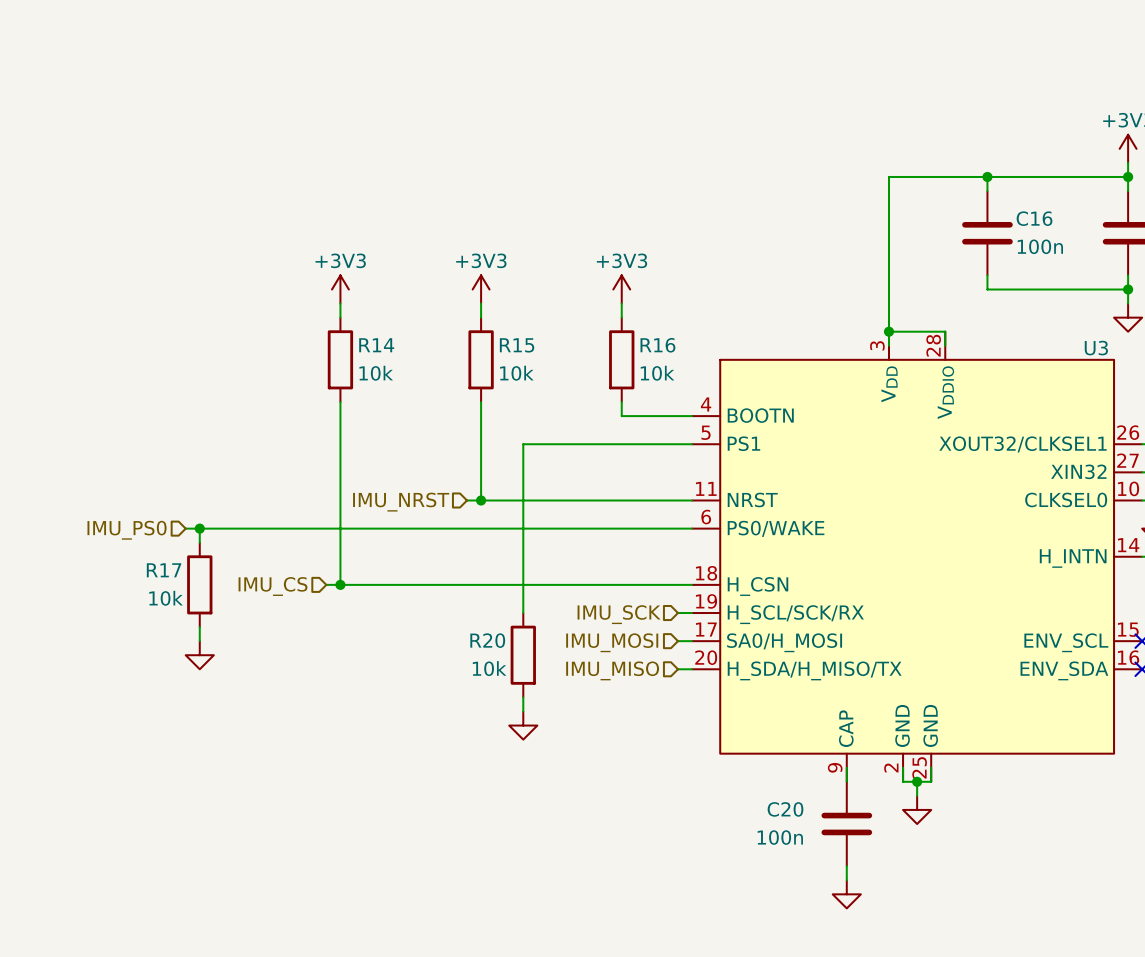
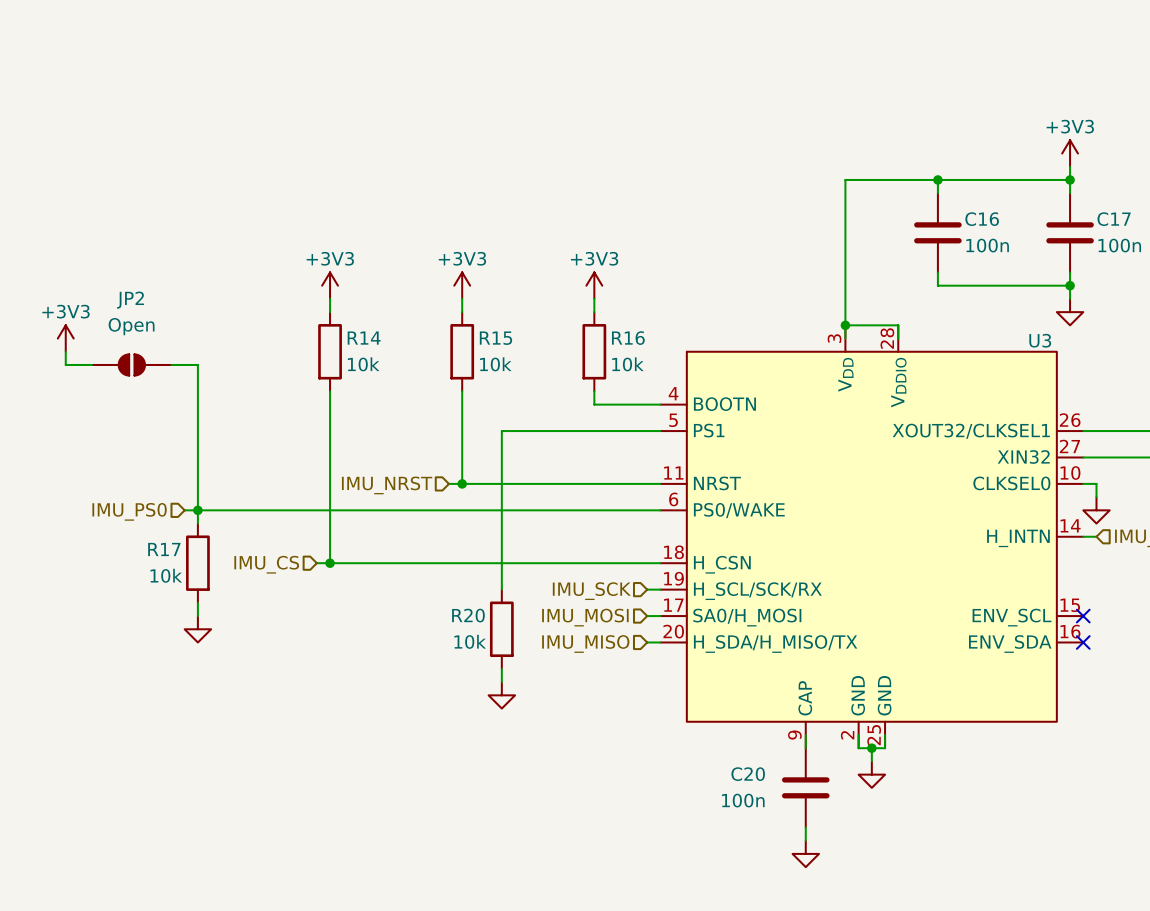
power symbol: none -> +3V3 (65, 338)
wire: none -> (65, 351) (65, 364) (92, 364)
JP2: none -> Open (131, 364)
wire: none -> (171, 364) (197, 364) (197, 510)

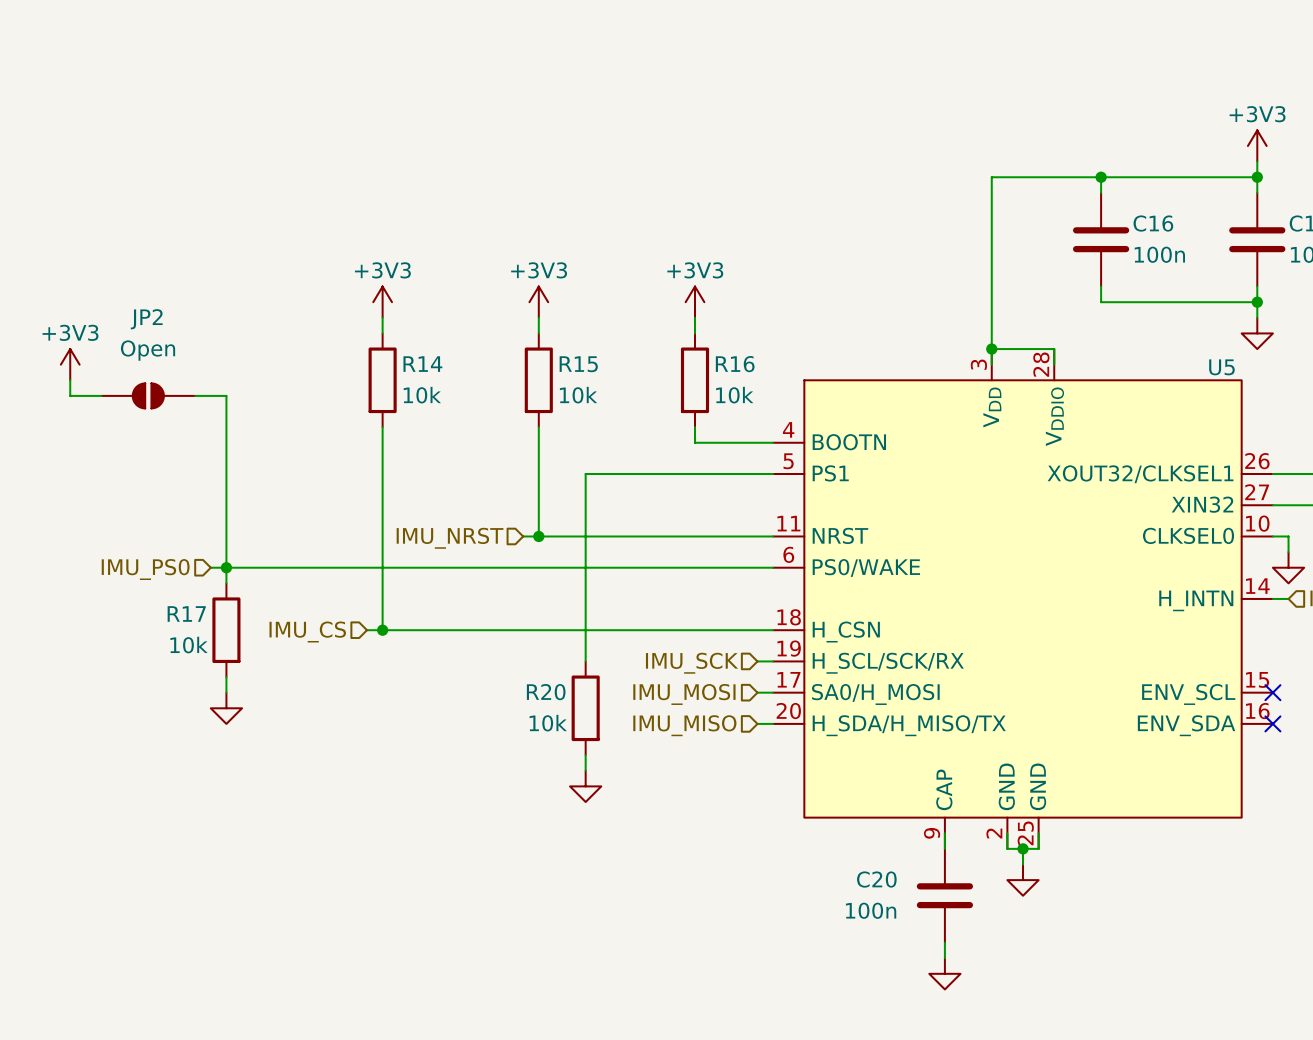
U3 name: U3 (1040, 340) -> U5 (1221, 367)

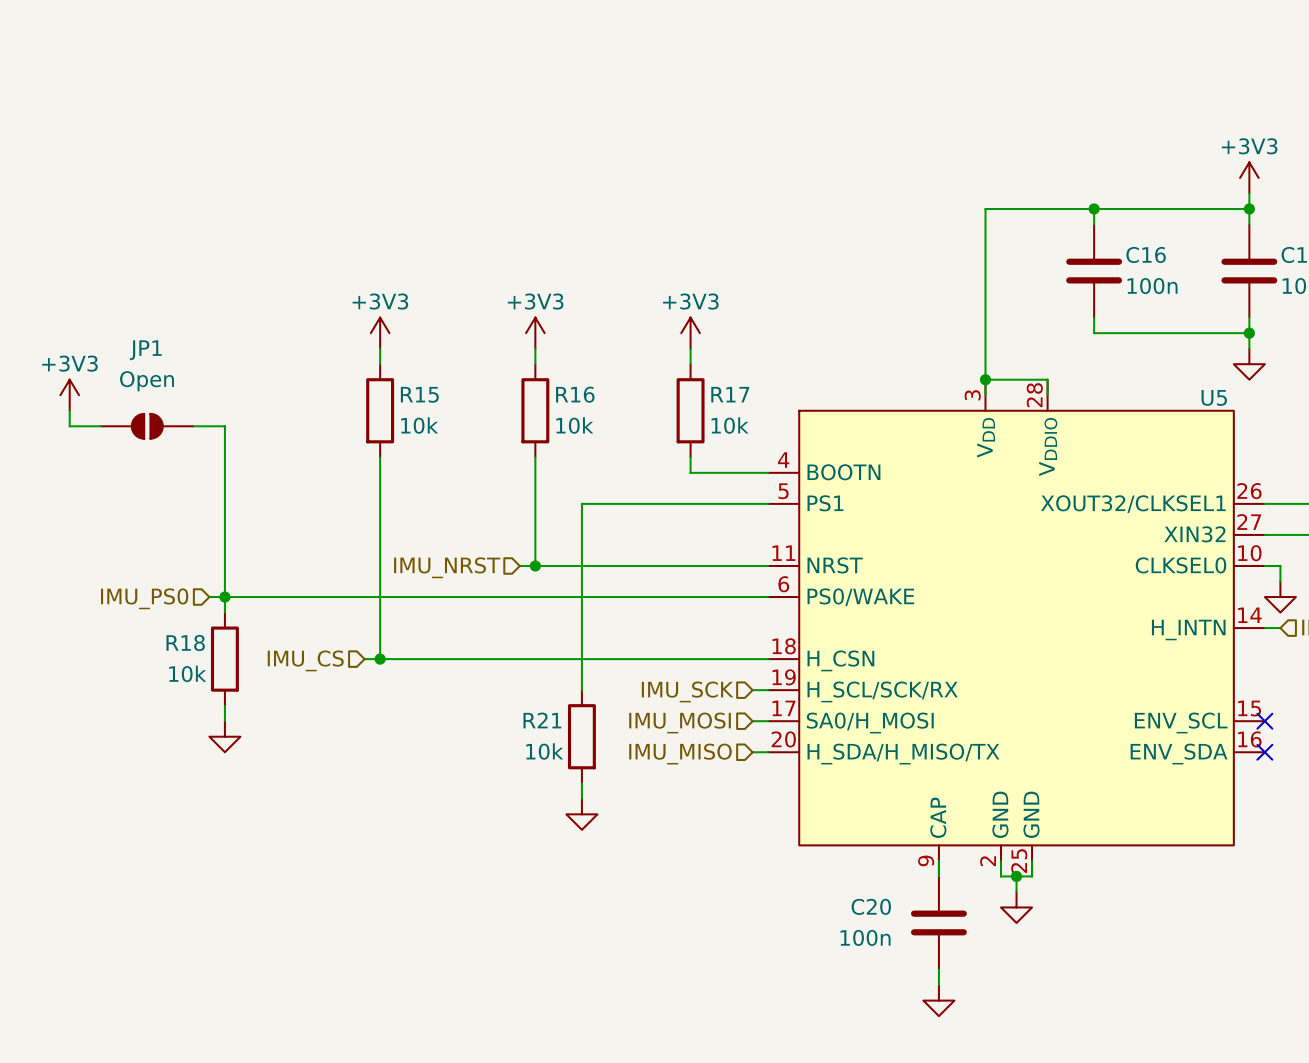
JP2 name: JP2 (146, 319) -> JP1 (145, 350)
R14 name: R14 (422, 364) -> R15 (419, 394)
R15 name: R15 (578, 364) -> R16 (575, 394)
R16 name: R16 (735, 364) -> R17 (730, 394)
R17 name: R17 (186, 613) -> R18 (185, 643)
R20 name: R20 (546, 692) -> R21 (542, 720)

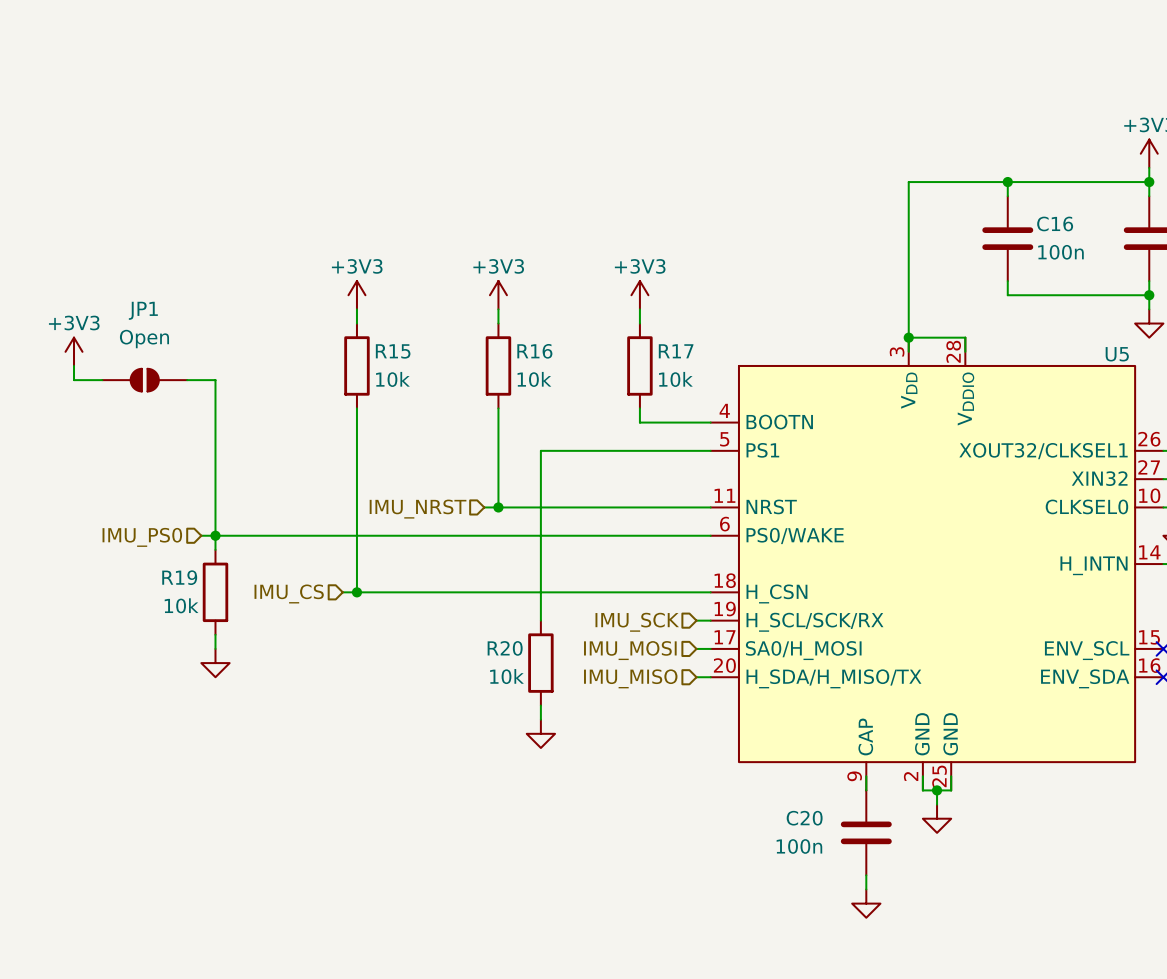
R18 name: R18 (185, 643) -> R19 (179, 577)
R21 name: R21 (542, 720) -> R20 (505, 648)

